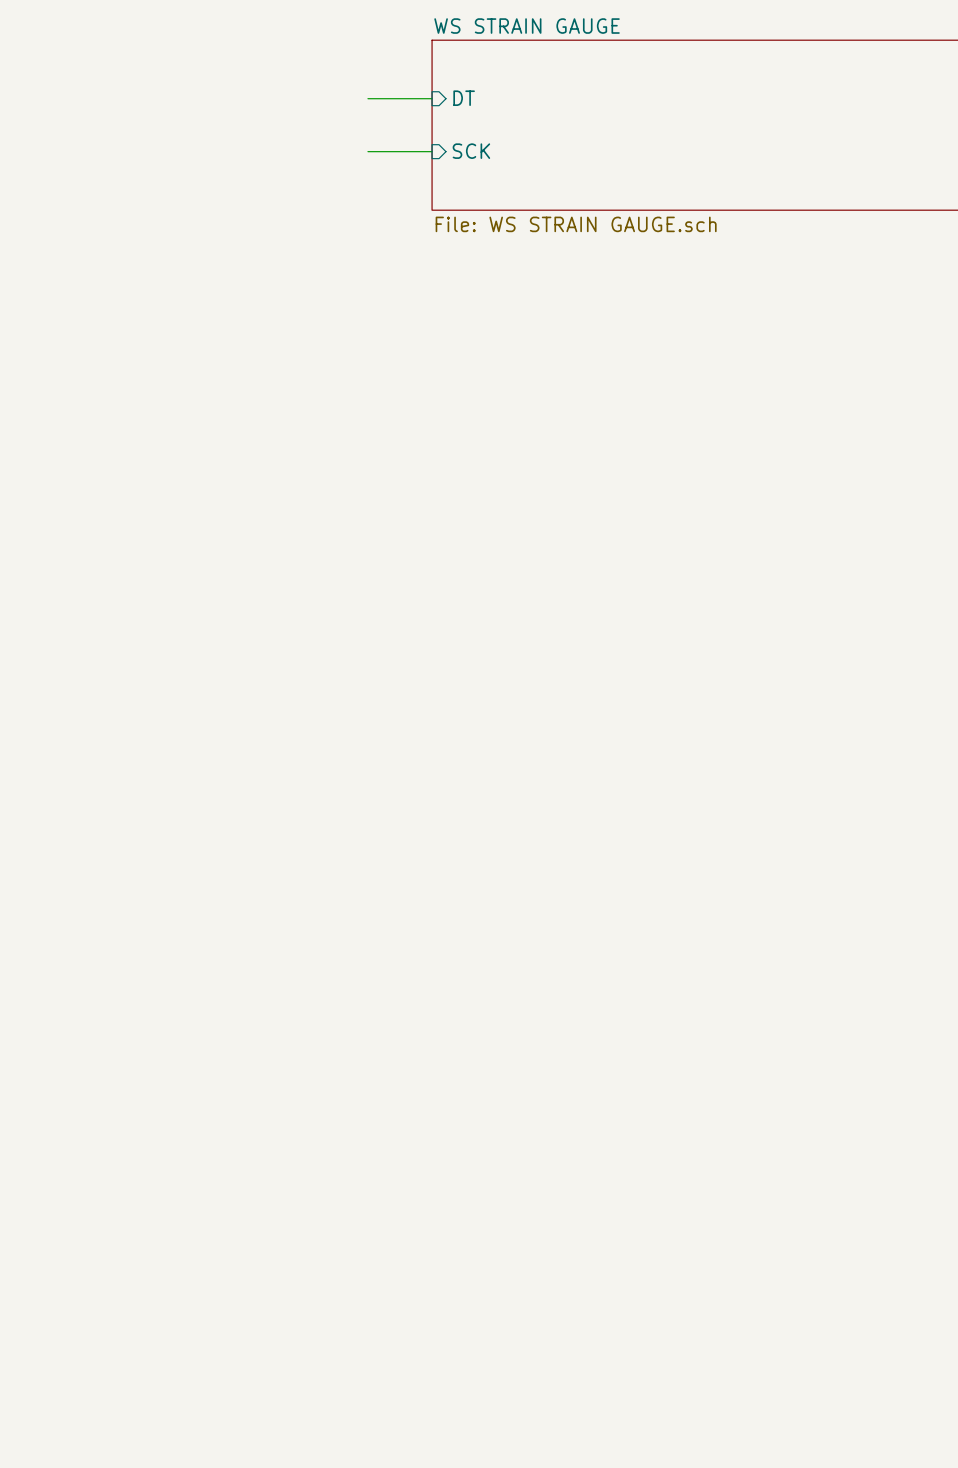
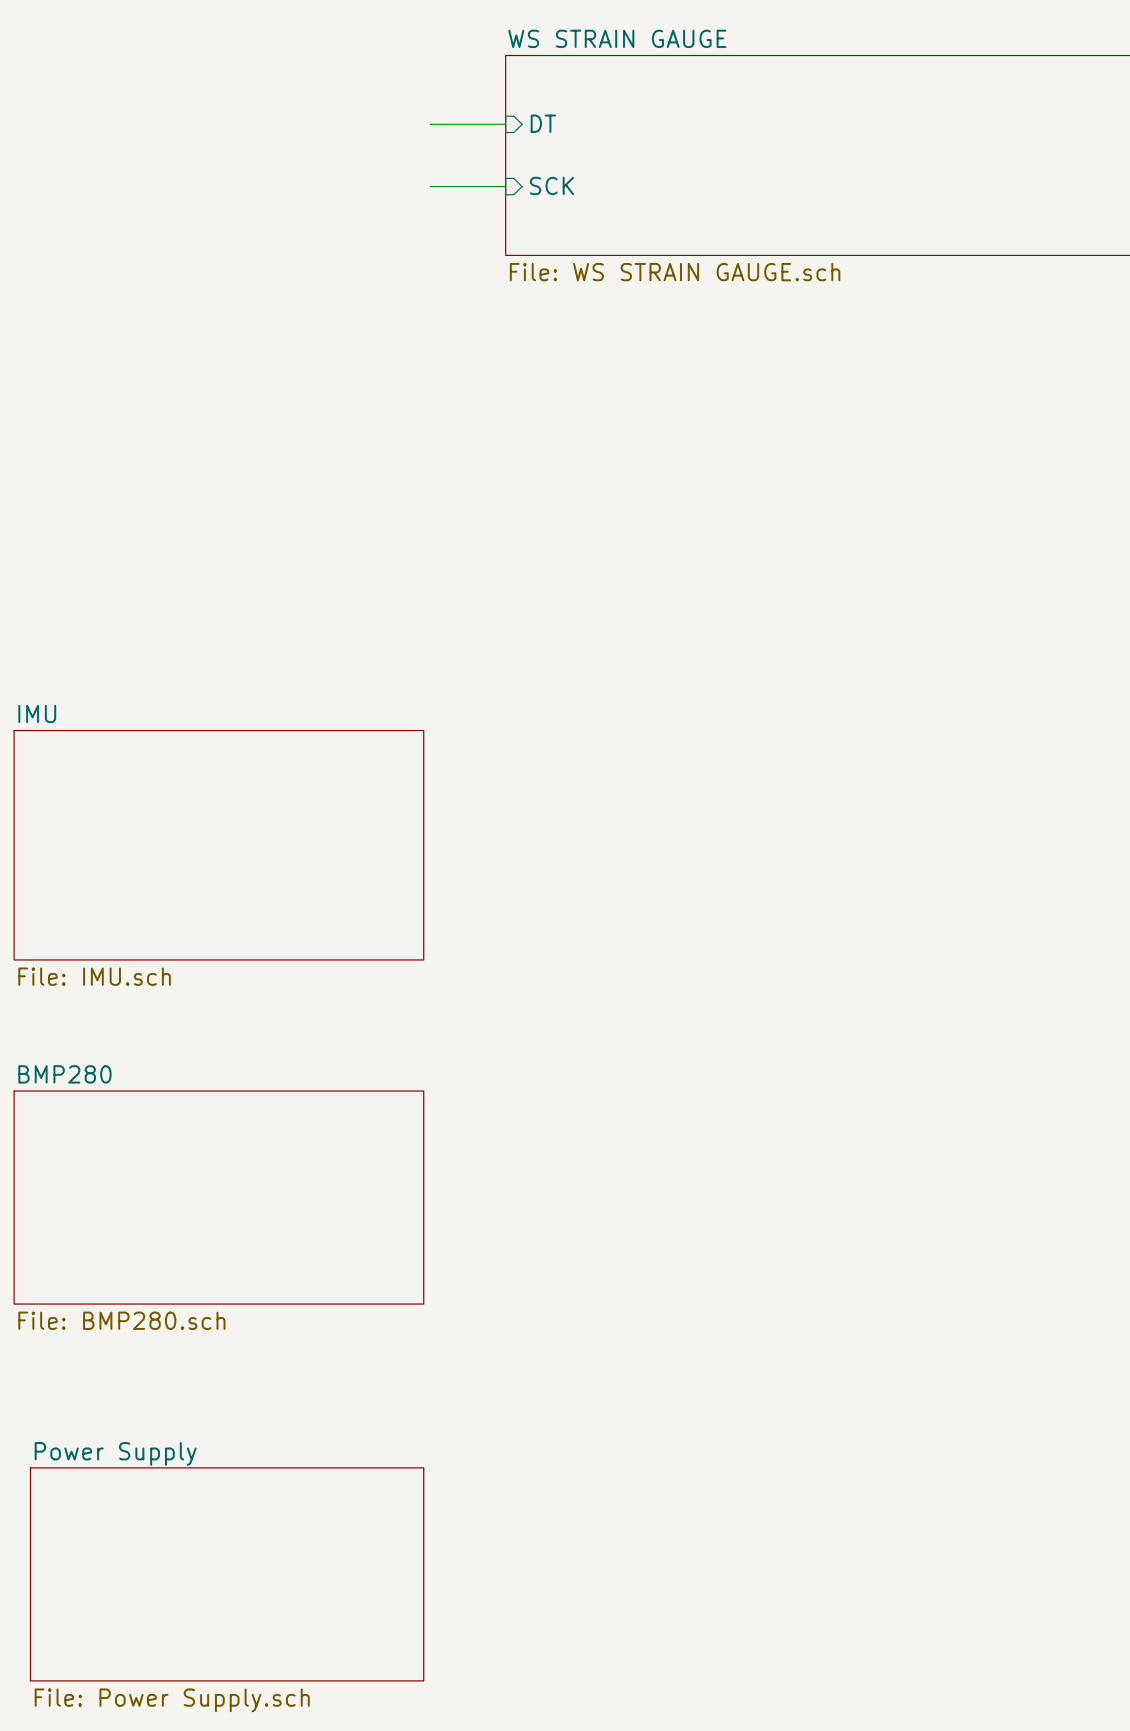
sheet IMU: none -> File: IMU.sch (218, 845)
sheet BMP280: none -> File: BMP280.sch (218, 1197)
sheet Power Supply: none -> File: Power Supply.sch (227, 1574)

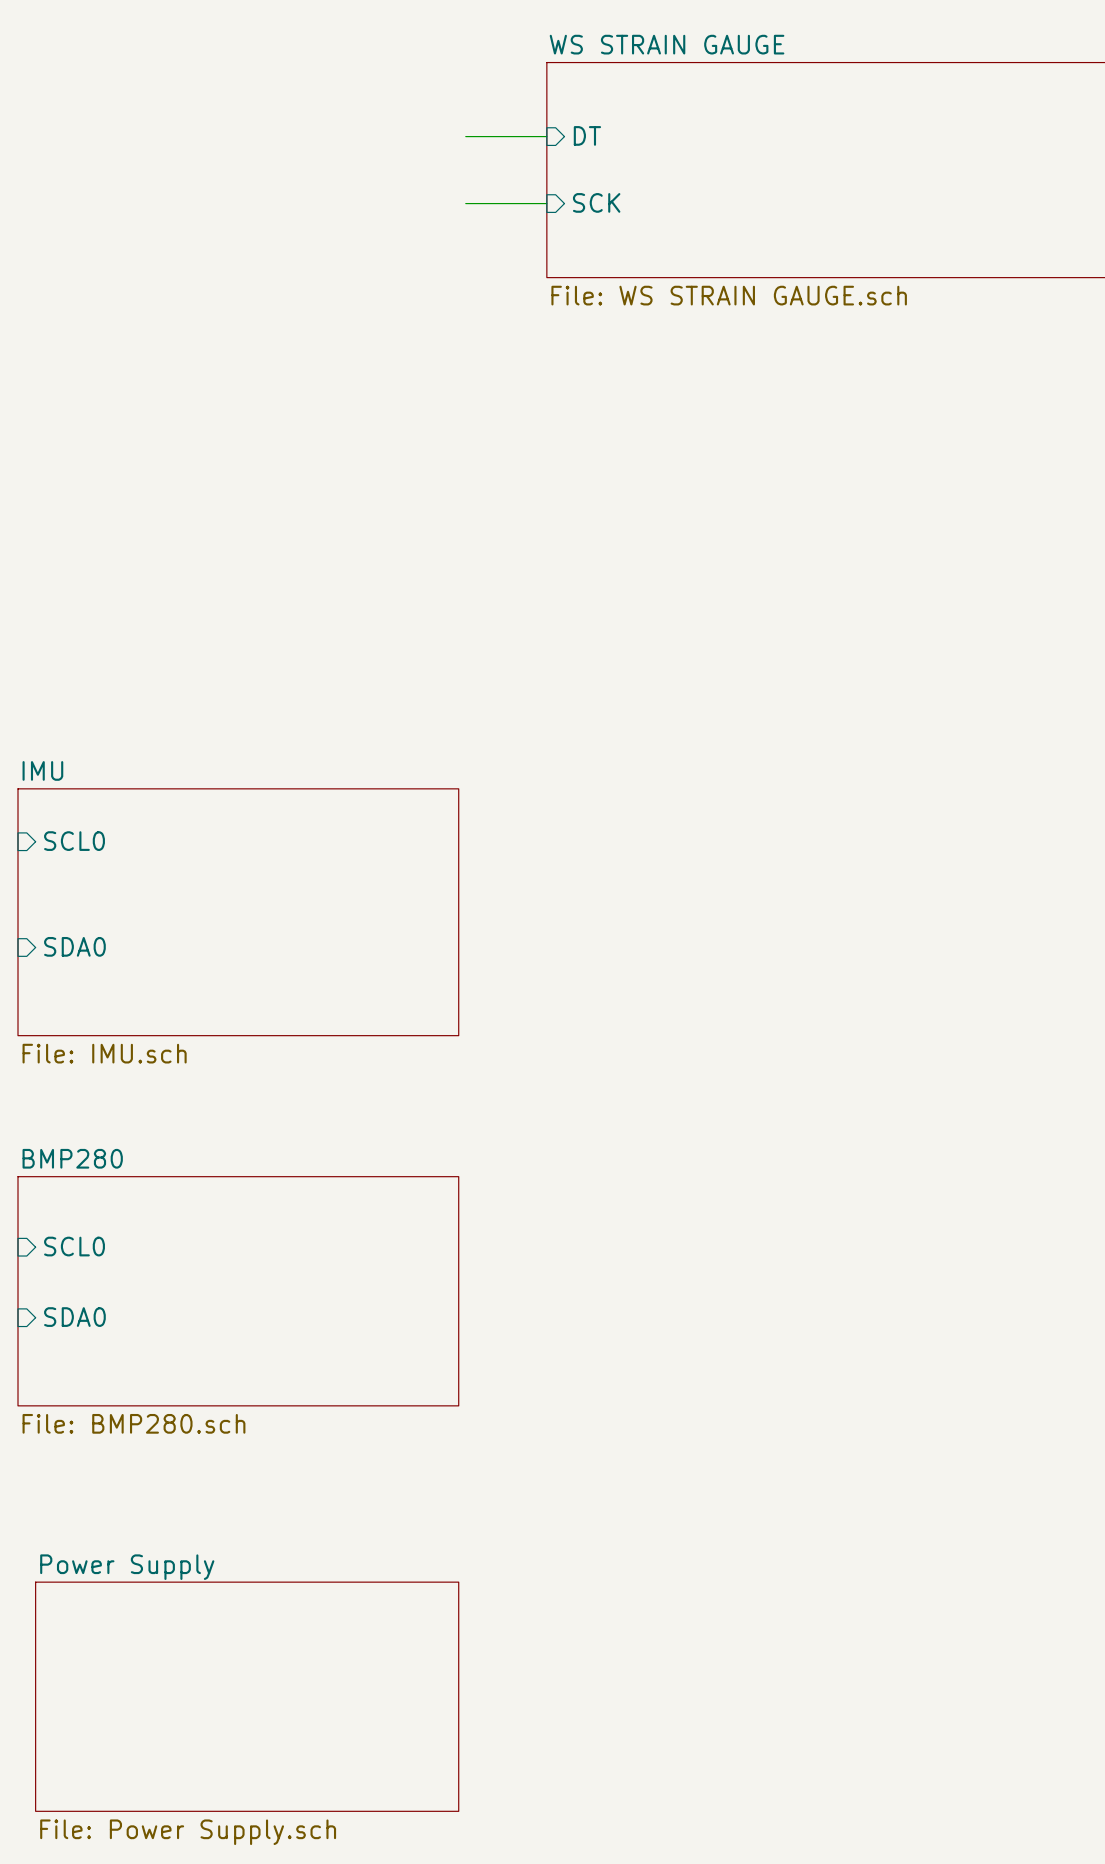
sheet pin: none -> SCL0 (74, 841)
sheet pin: none -> SDA0 (74, 946)
sheet pin: none -> SCL0 (74, 1246)
sheet pin: none -> SDA0 (74, 1317)

